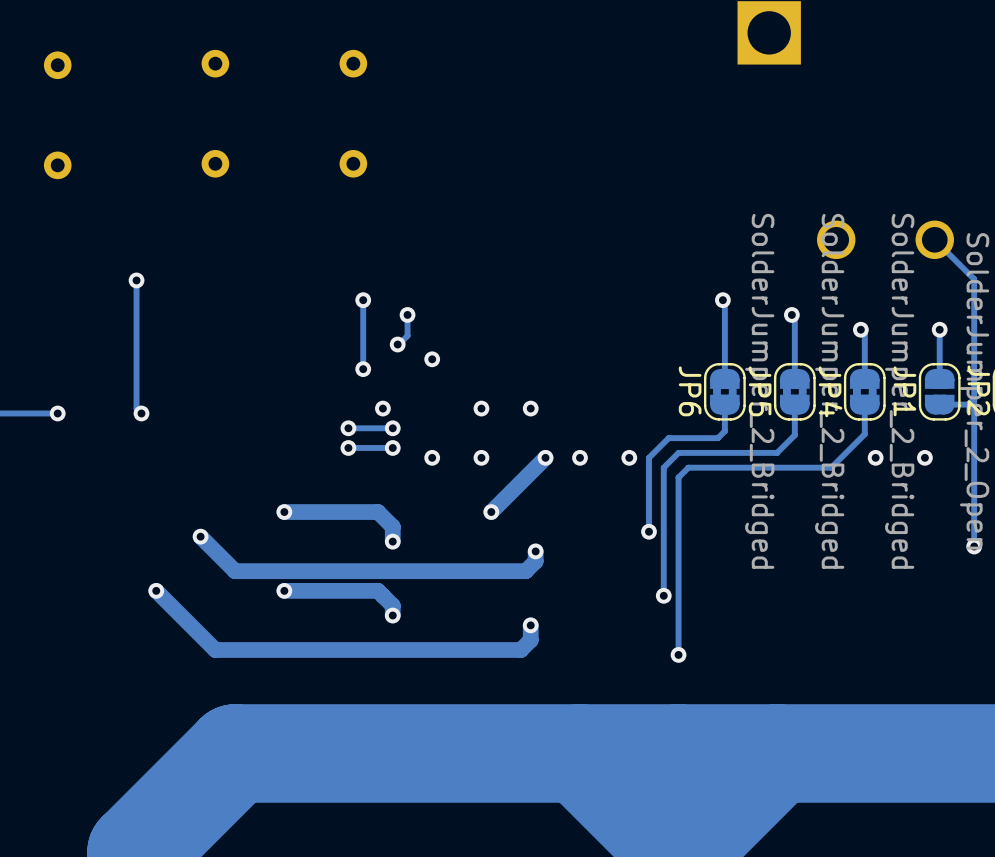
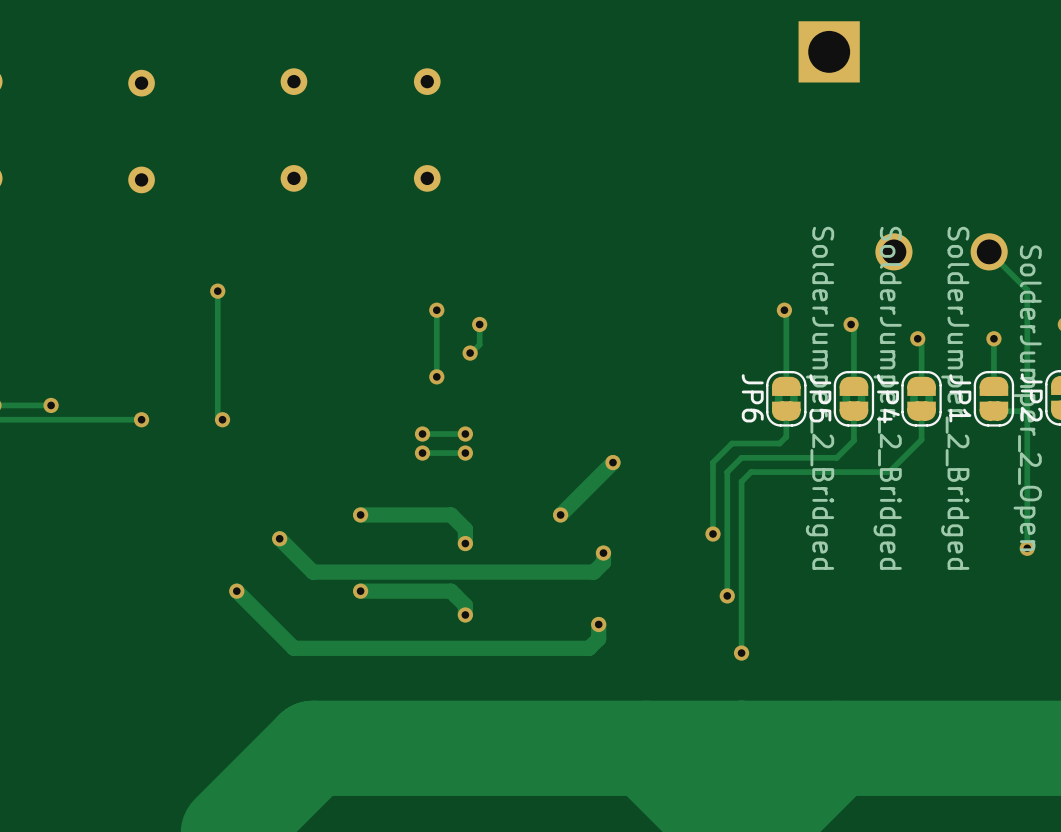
via: (432, 359) -> none
via: (382, 408) -> none
via: (481, 408) -> none
via: (530, 408) -> none
via: (432, 457) -> none
via: (481, 457) -> none
via: (580, 457) -> none
via: (629, 457) -> none
via: (875, 457) -> none
via: (924, 457) -> none

